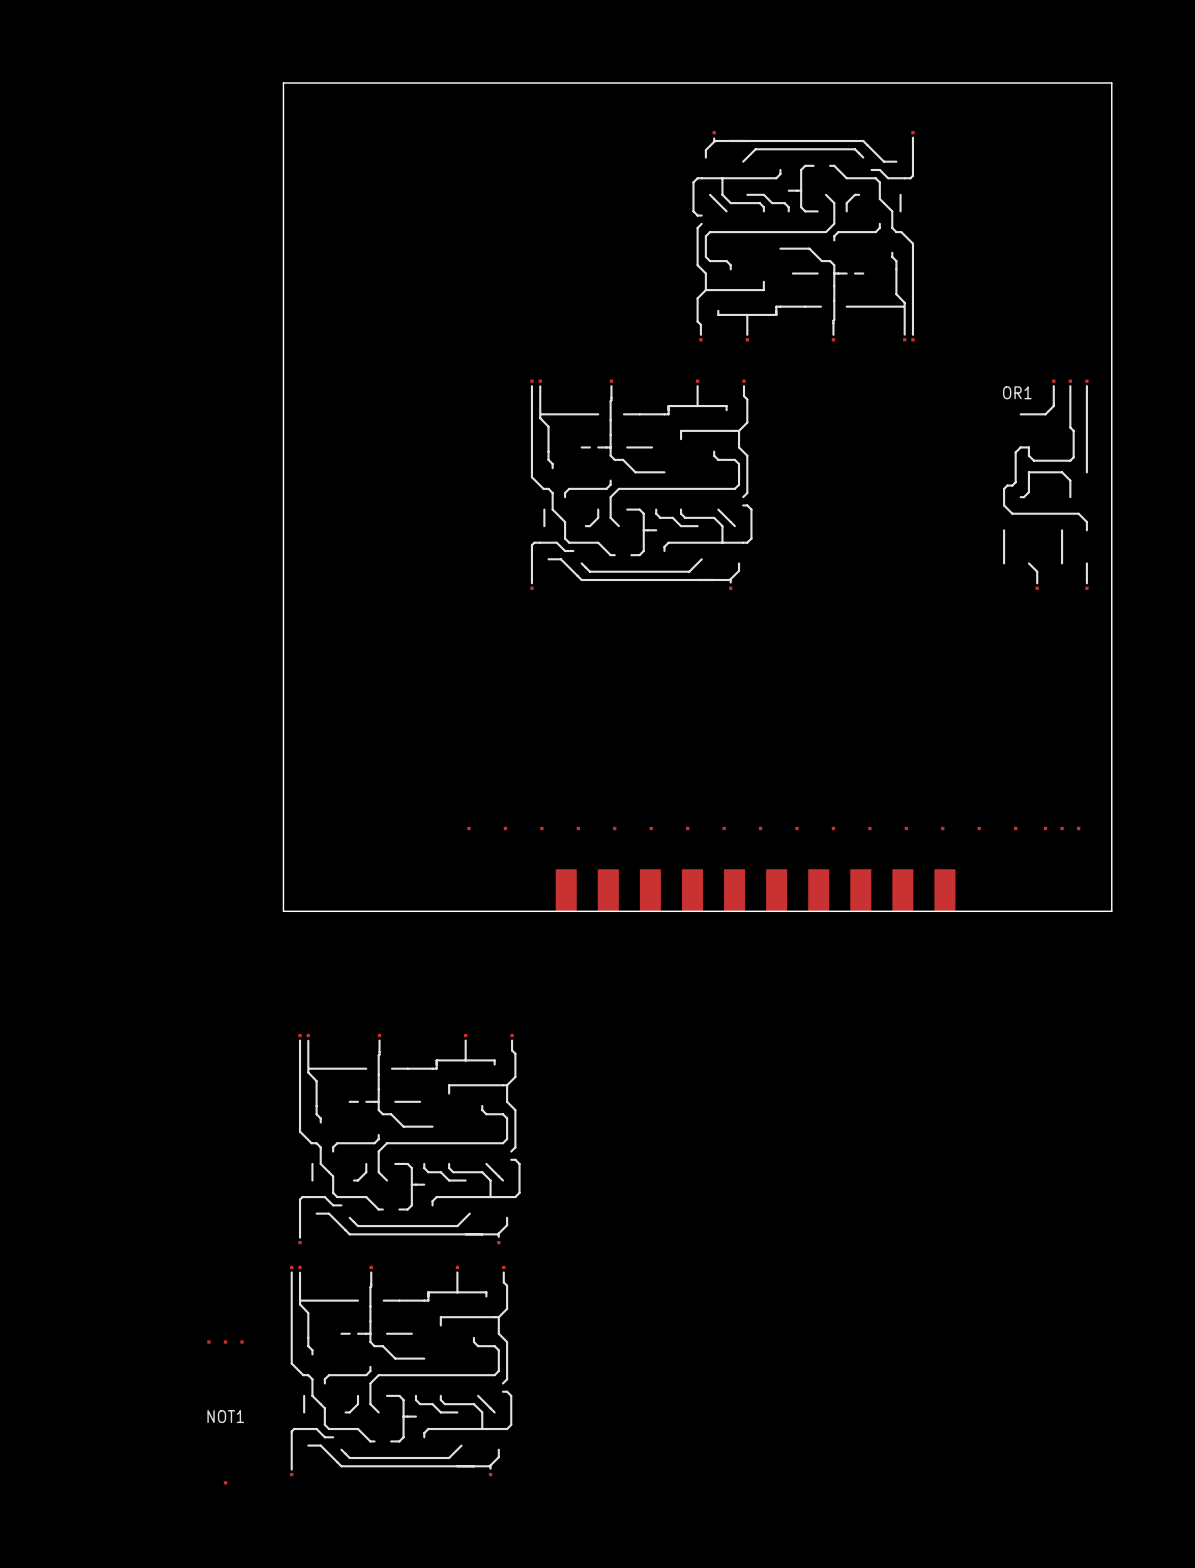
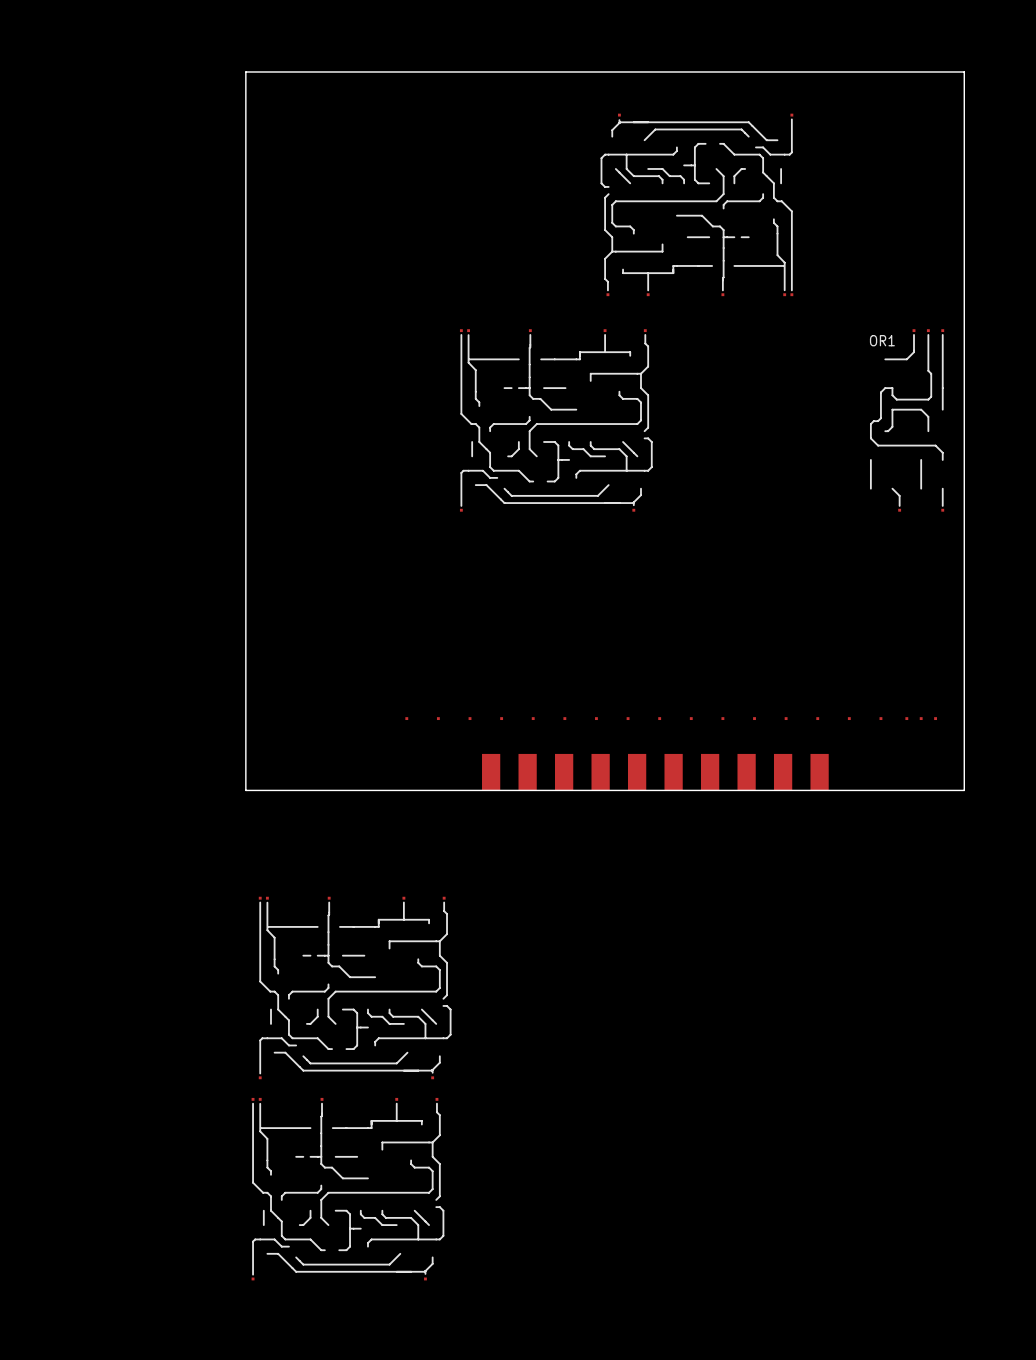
NOT1: (225, 1412) -> none

